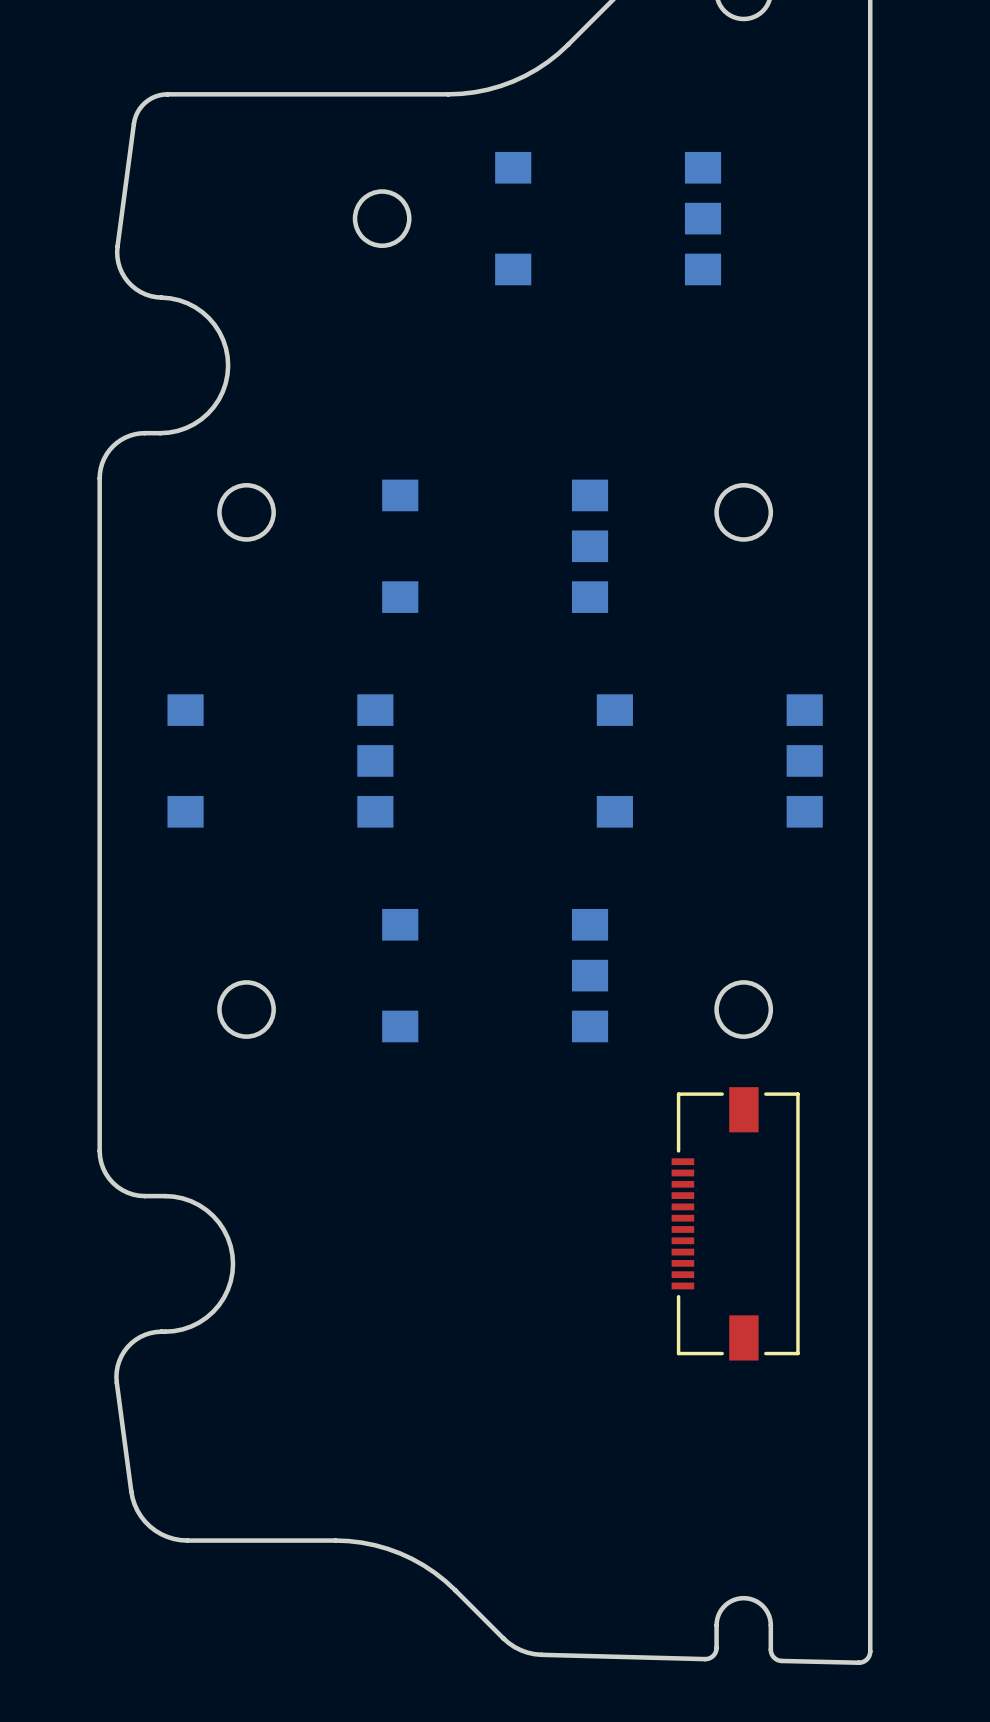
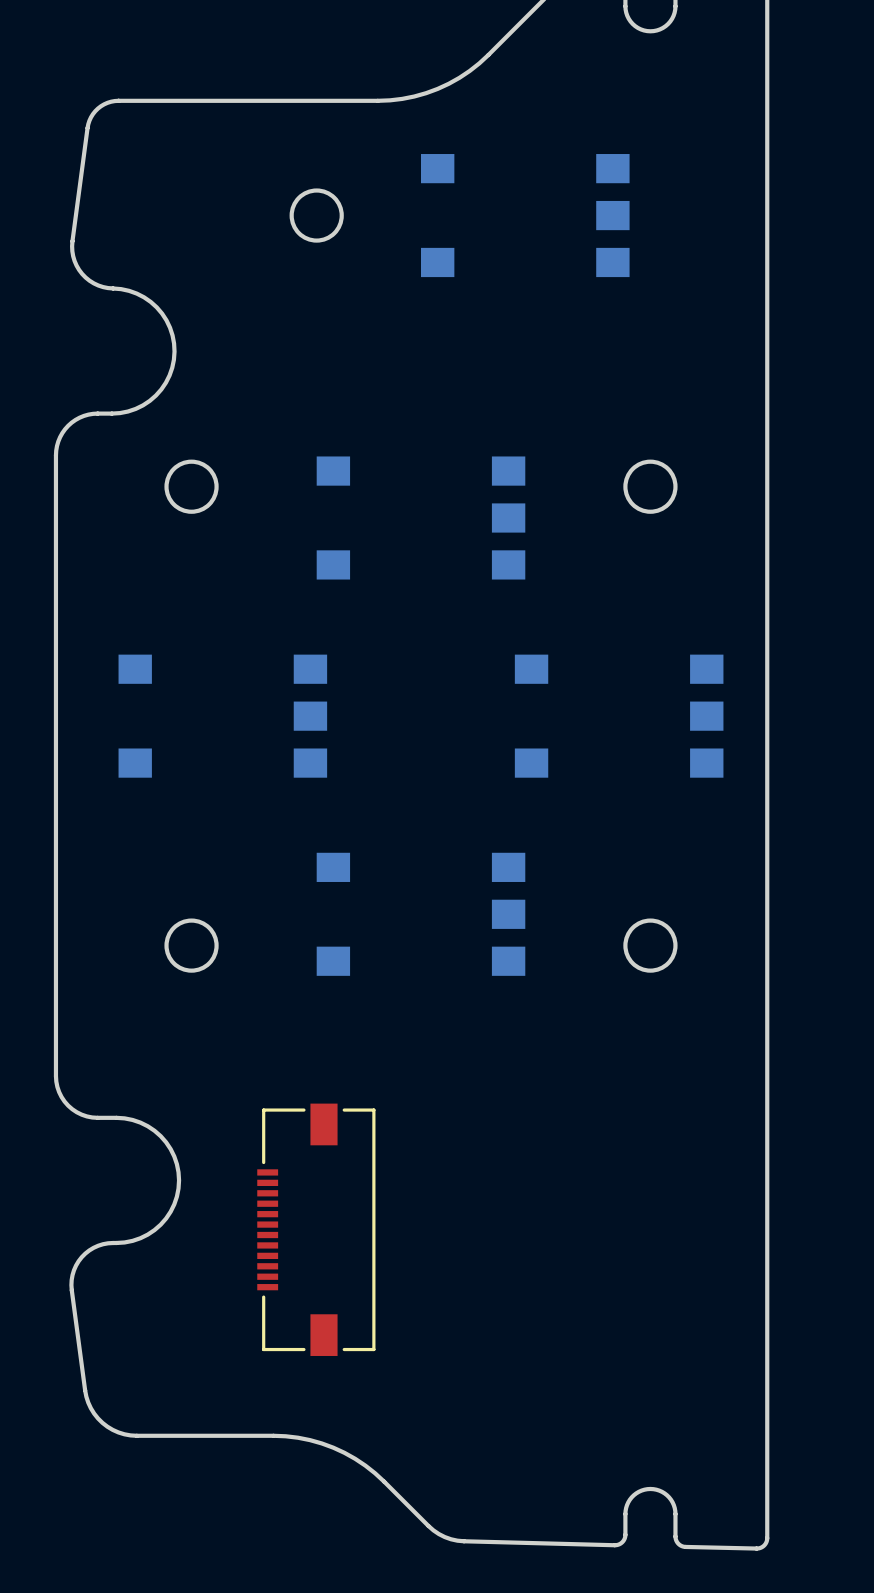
part position: (728, 1223) -> (309, 1229)

